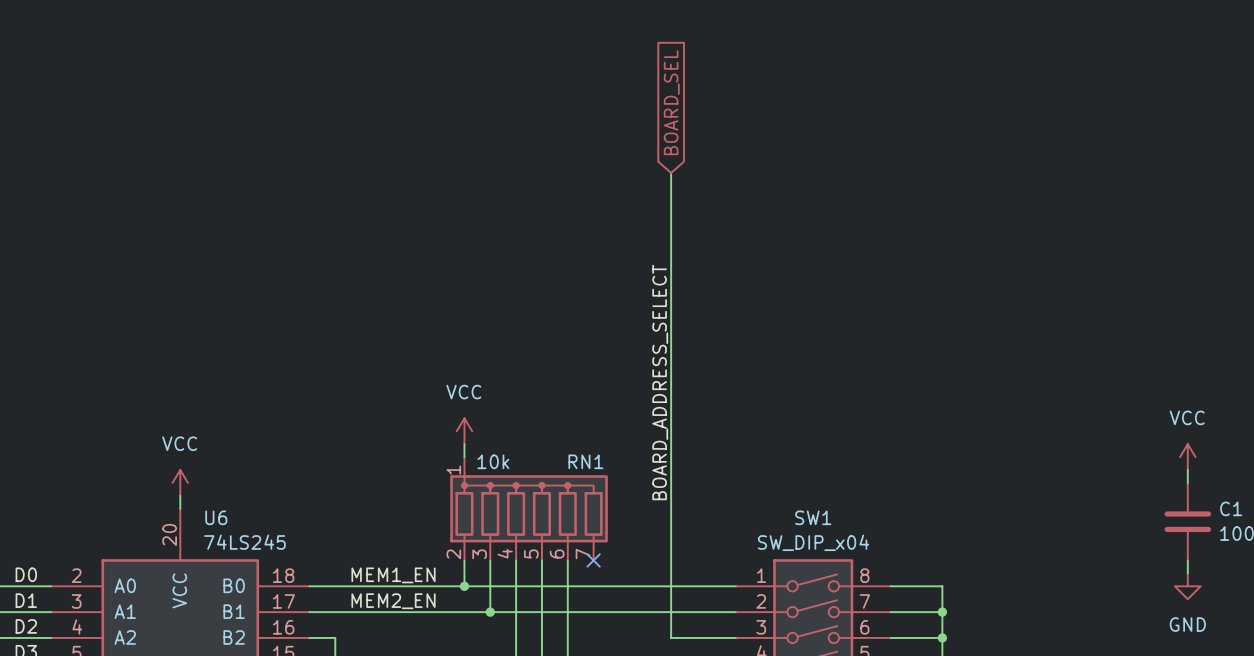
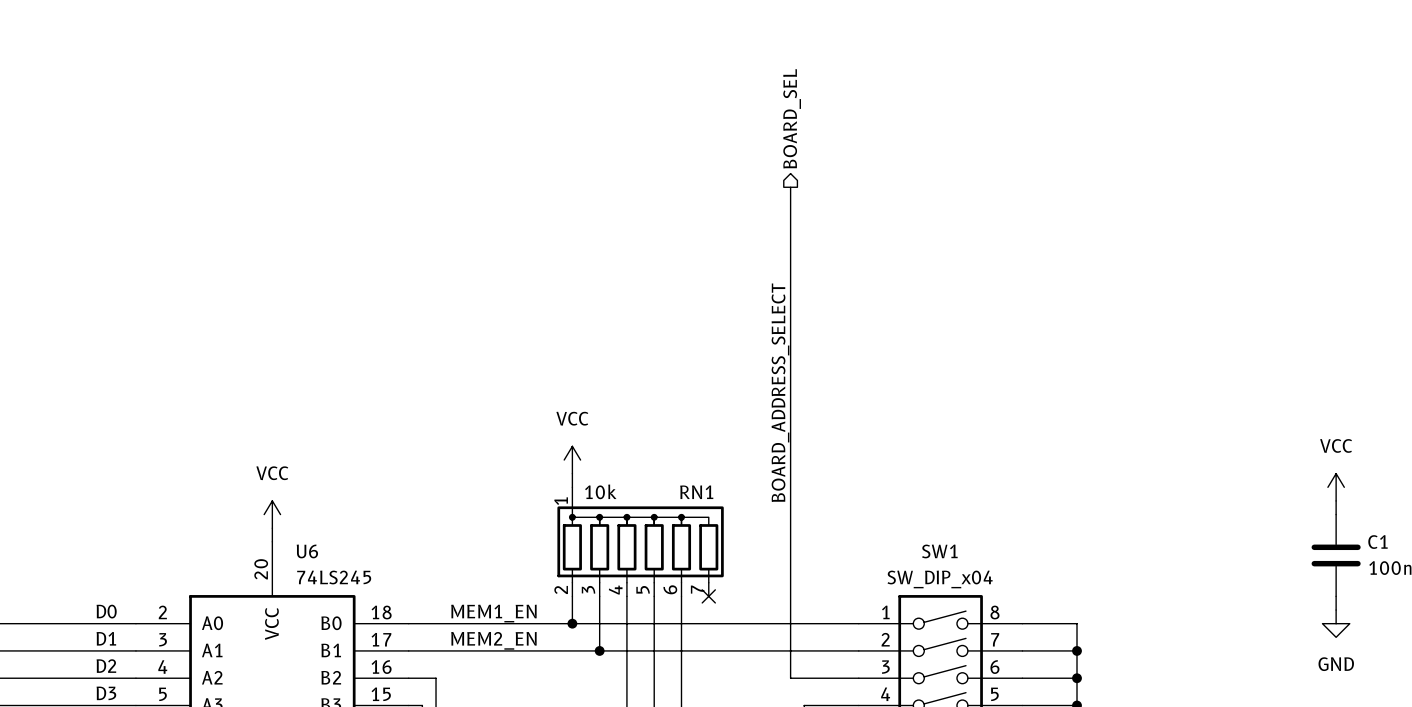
hierarchical label: none -> BOARD_SEL (792, 118)
global label: BOARD_SEL (671, 102) -> none

